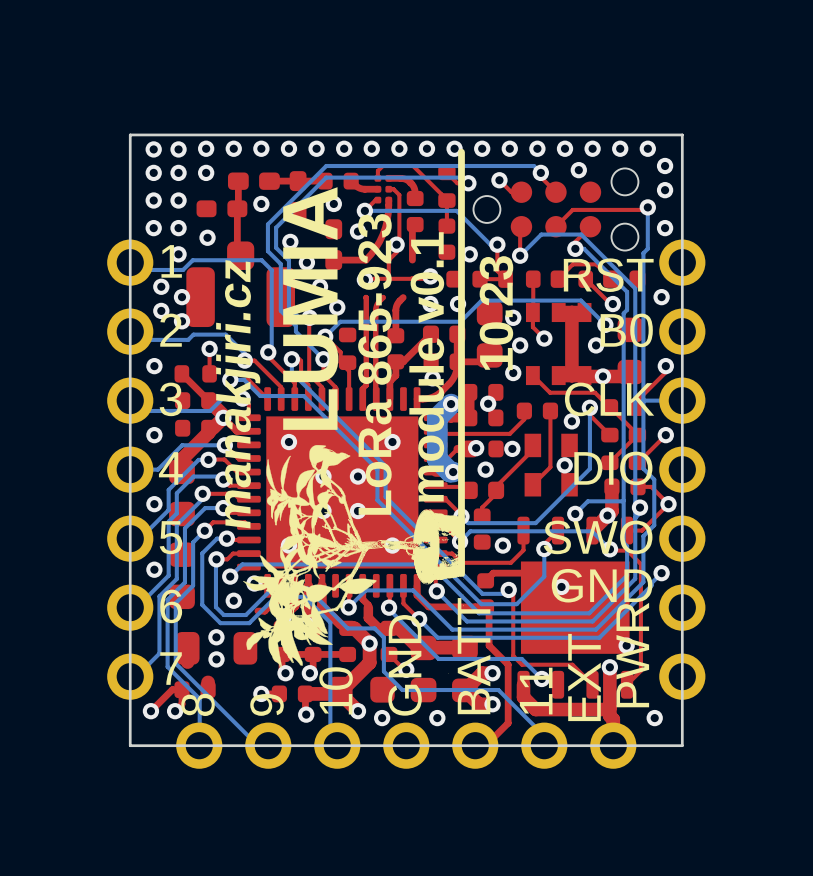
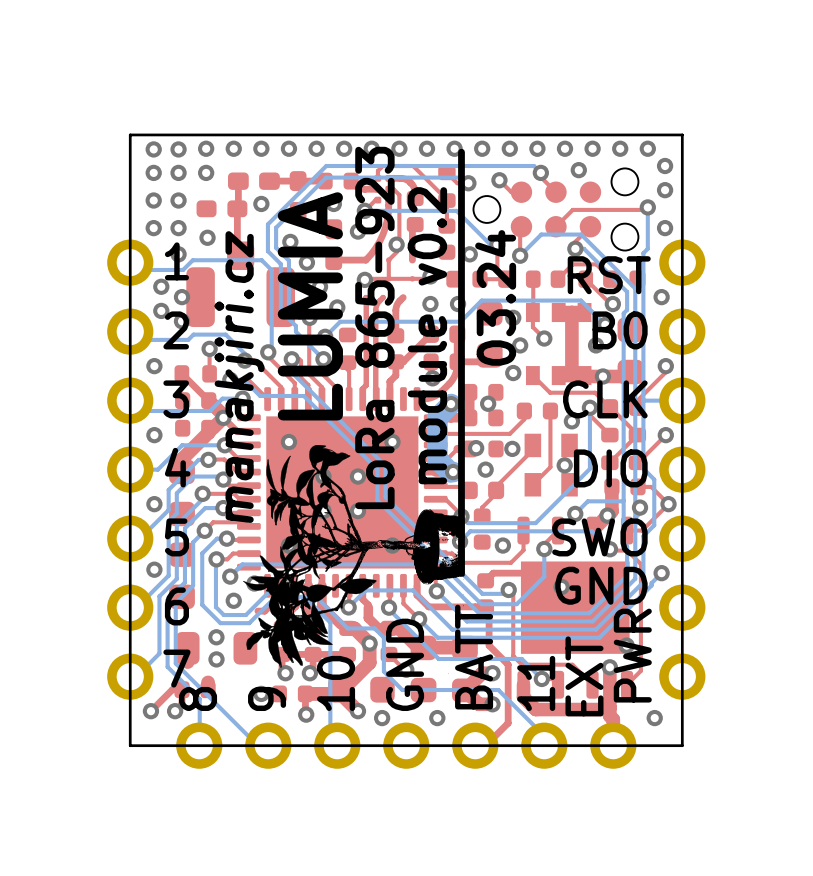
text: 10.23 (496, 313) -> 03.24 (495, 297)
text: module v0.1 (426, 366) -> module v0.2 (427, 335)

